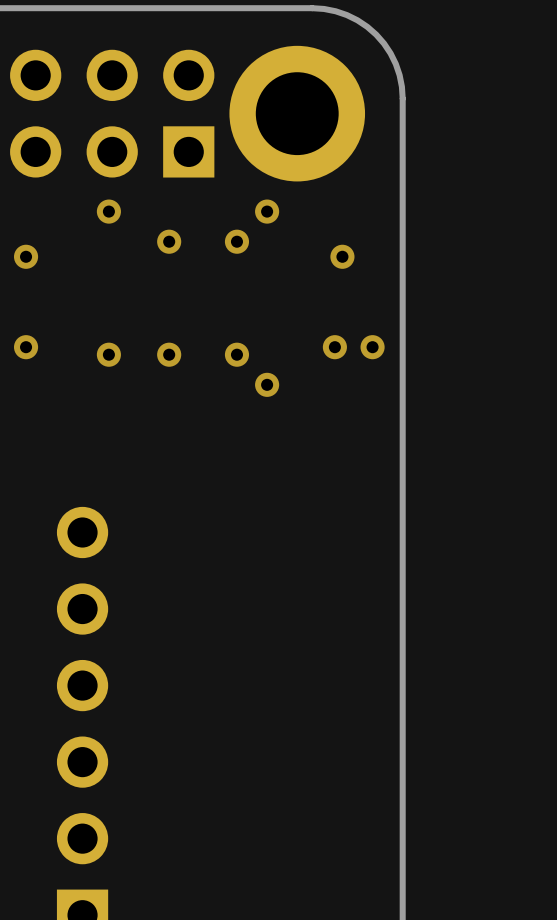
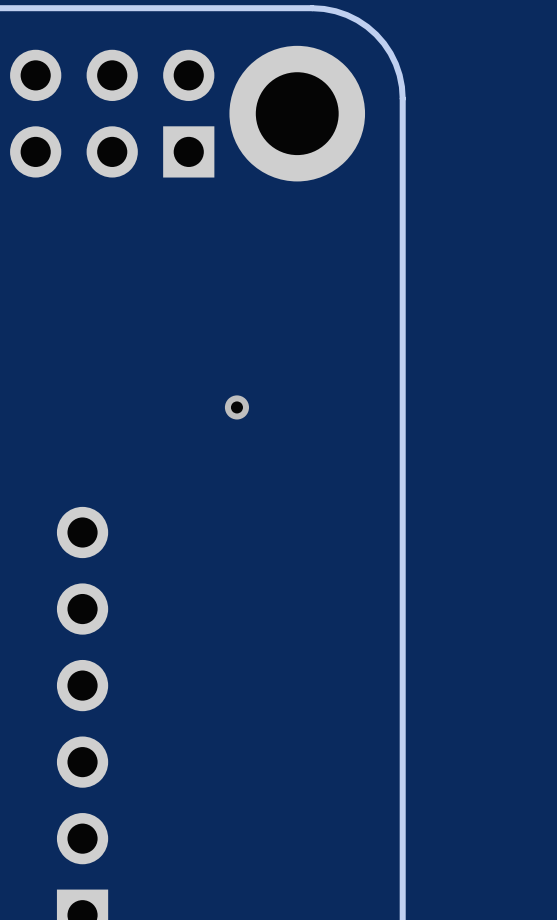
via: (108, 211) -> none
via: (267, 211) -> none
via: (169, 241) -> none
via: (236, 241) -> none
via: (26, 256) -> none
via: (342, 256) -> none
via: (26, 347) -> none
via: (334, 347) -> none
via: (372, 347) -> none
via: (108, 354) -> none
via: (169, 354) -> none
via: (236, 354) -> none
via: (267, 384) -> none
via: none -> (236, 407)

